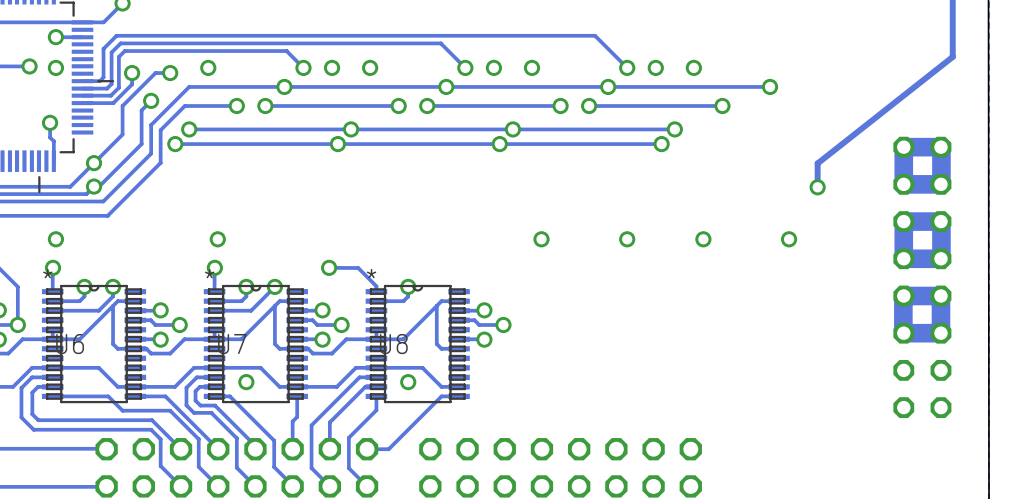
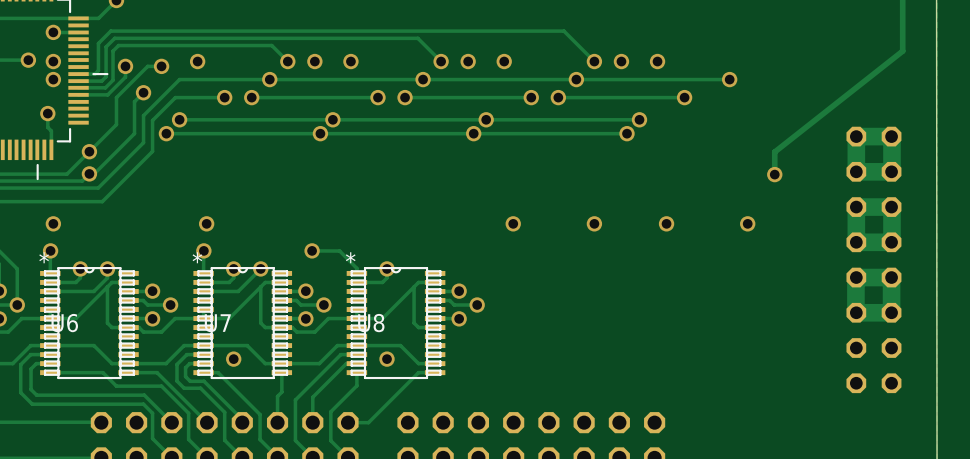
via: none -> (53, 79)

